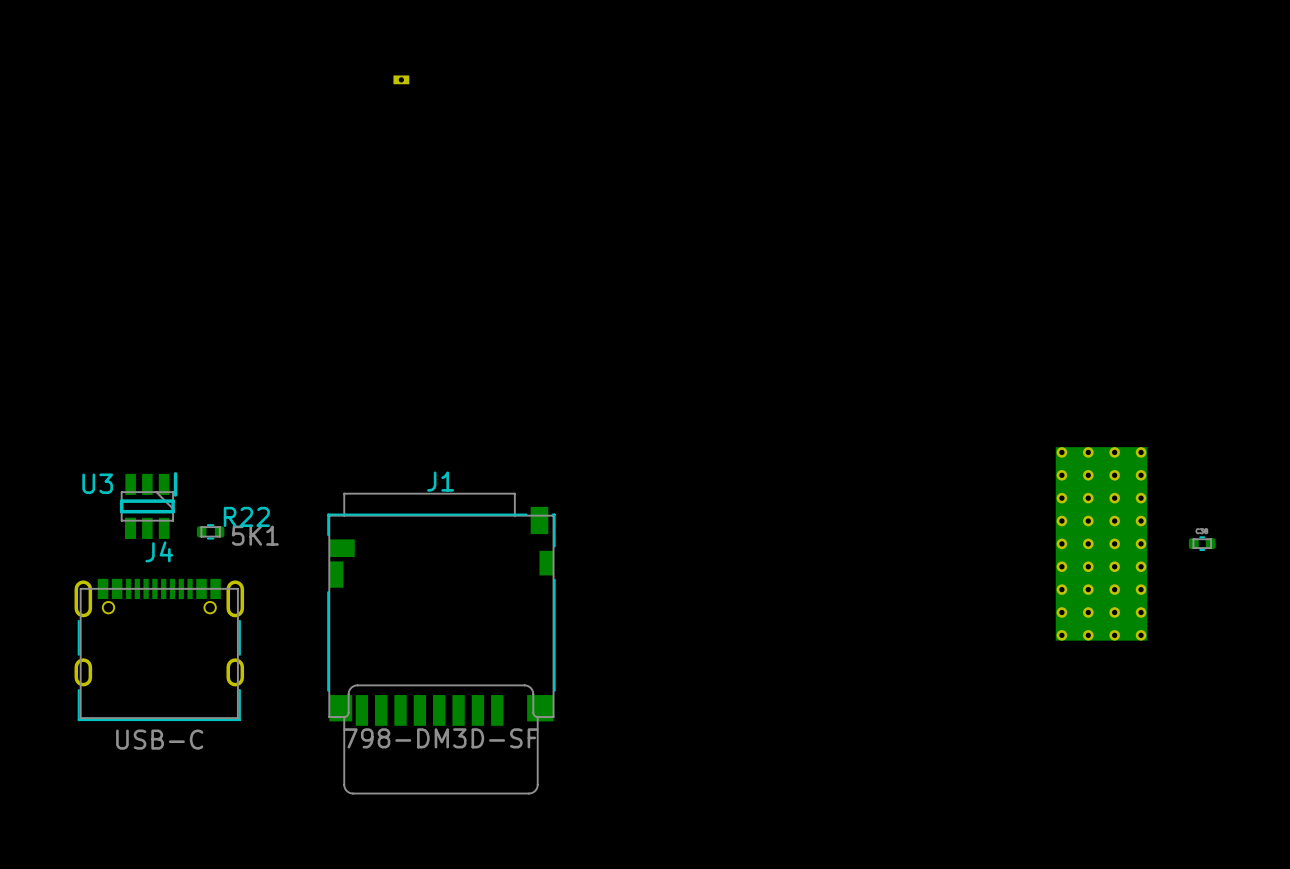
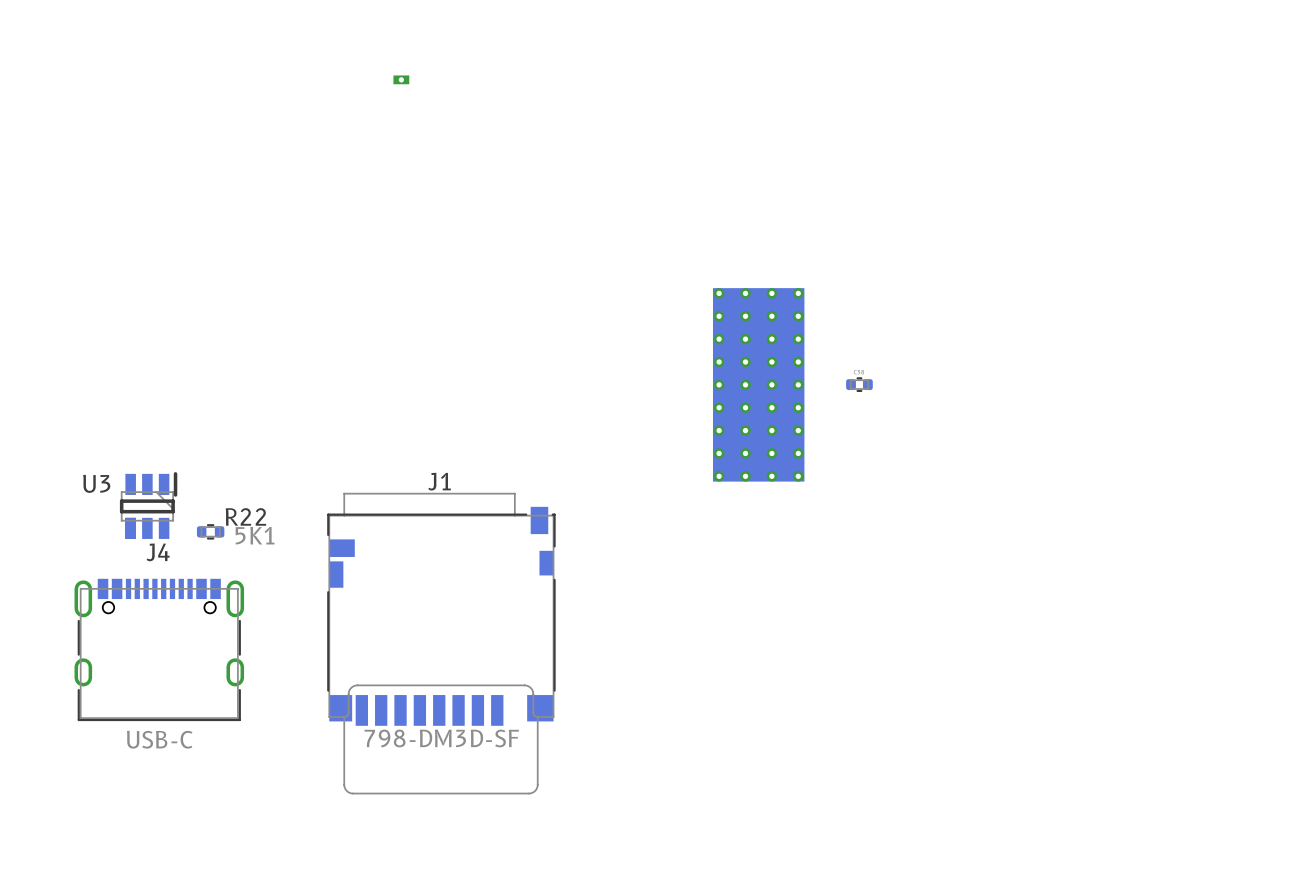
part position: (1101, 543) -> (758, 384)
part position: (1202, 543) -> (859, 384)

